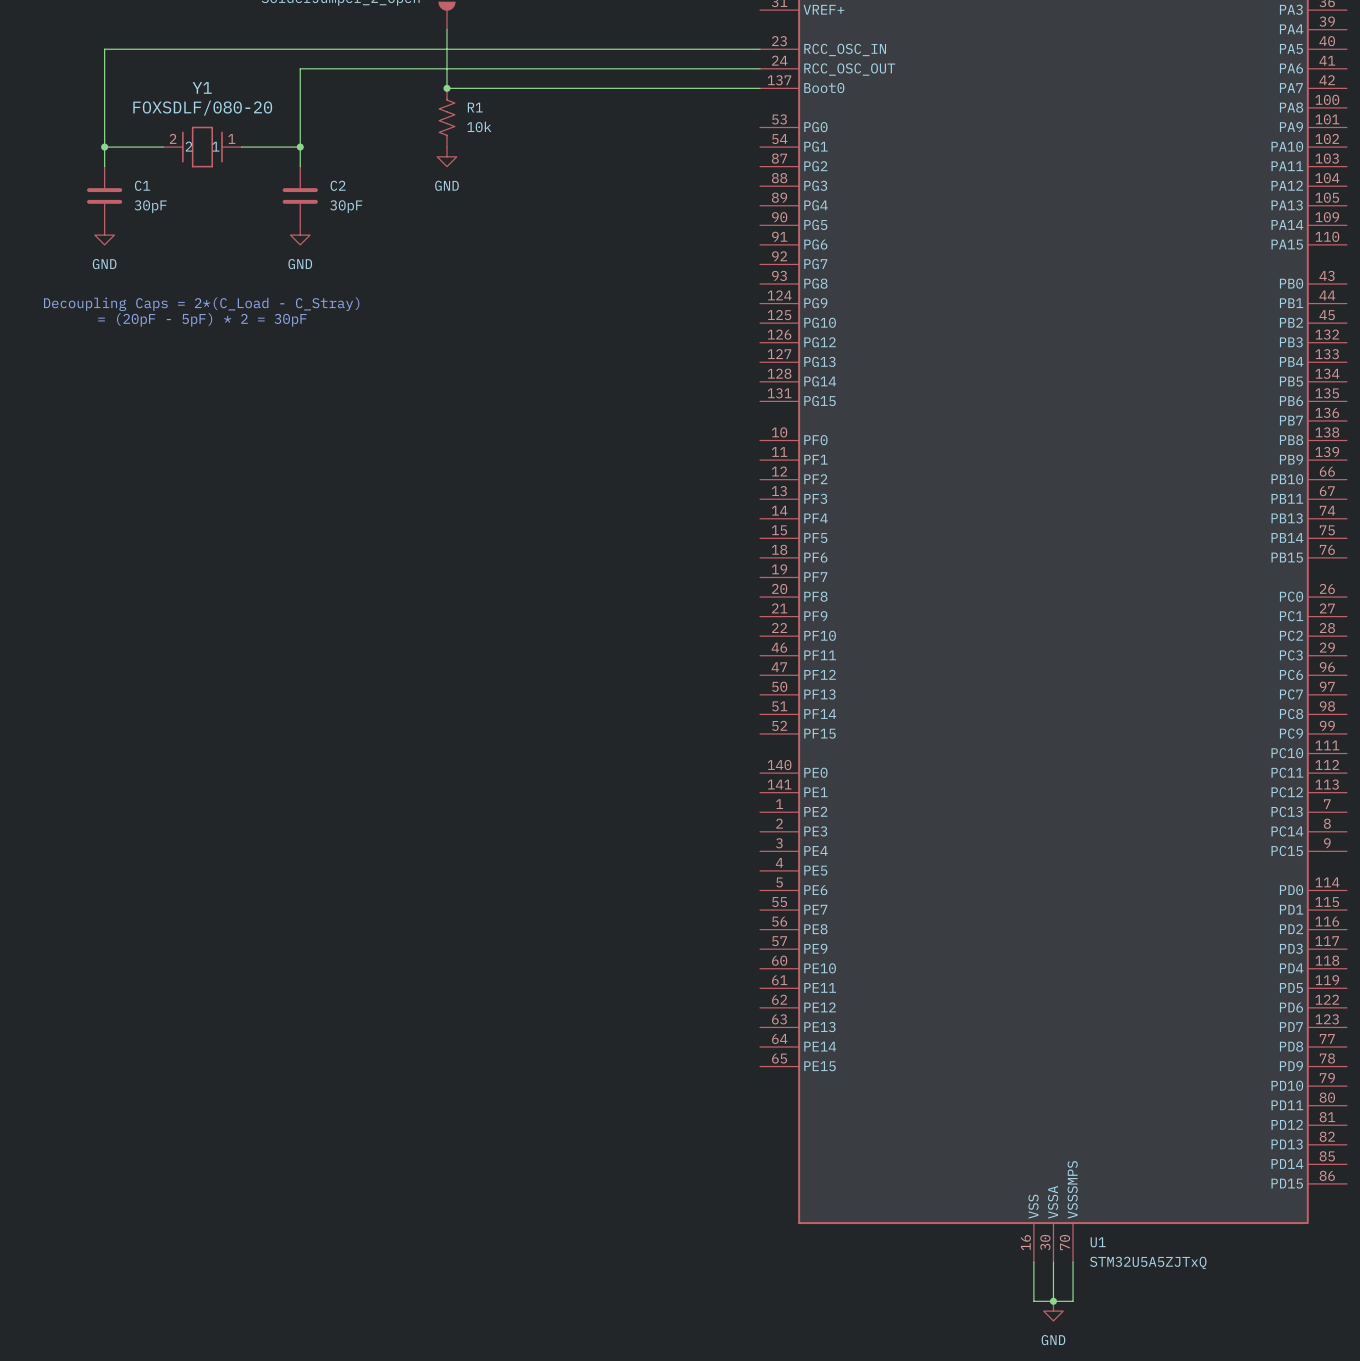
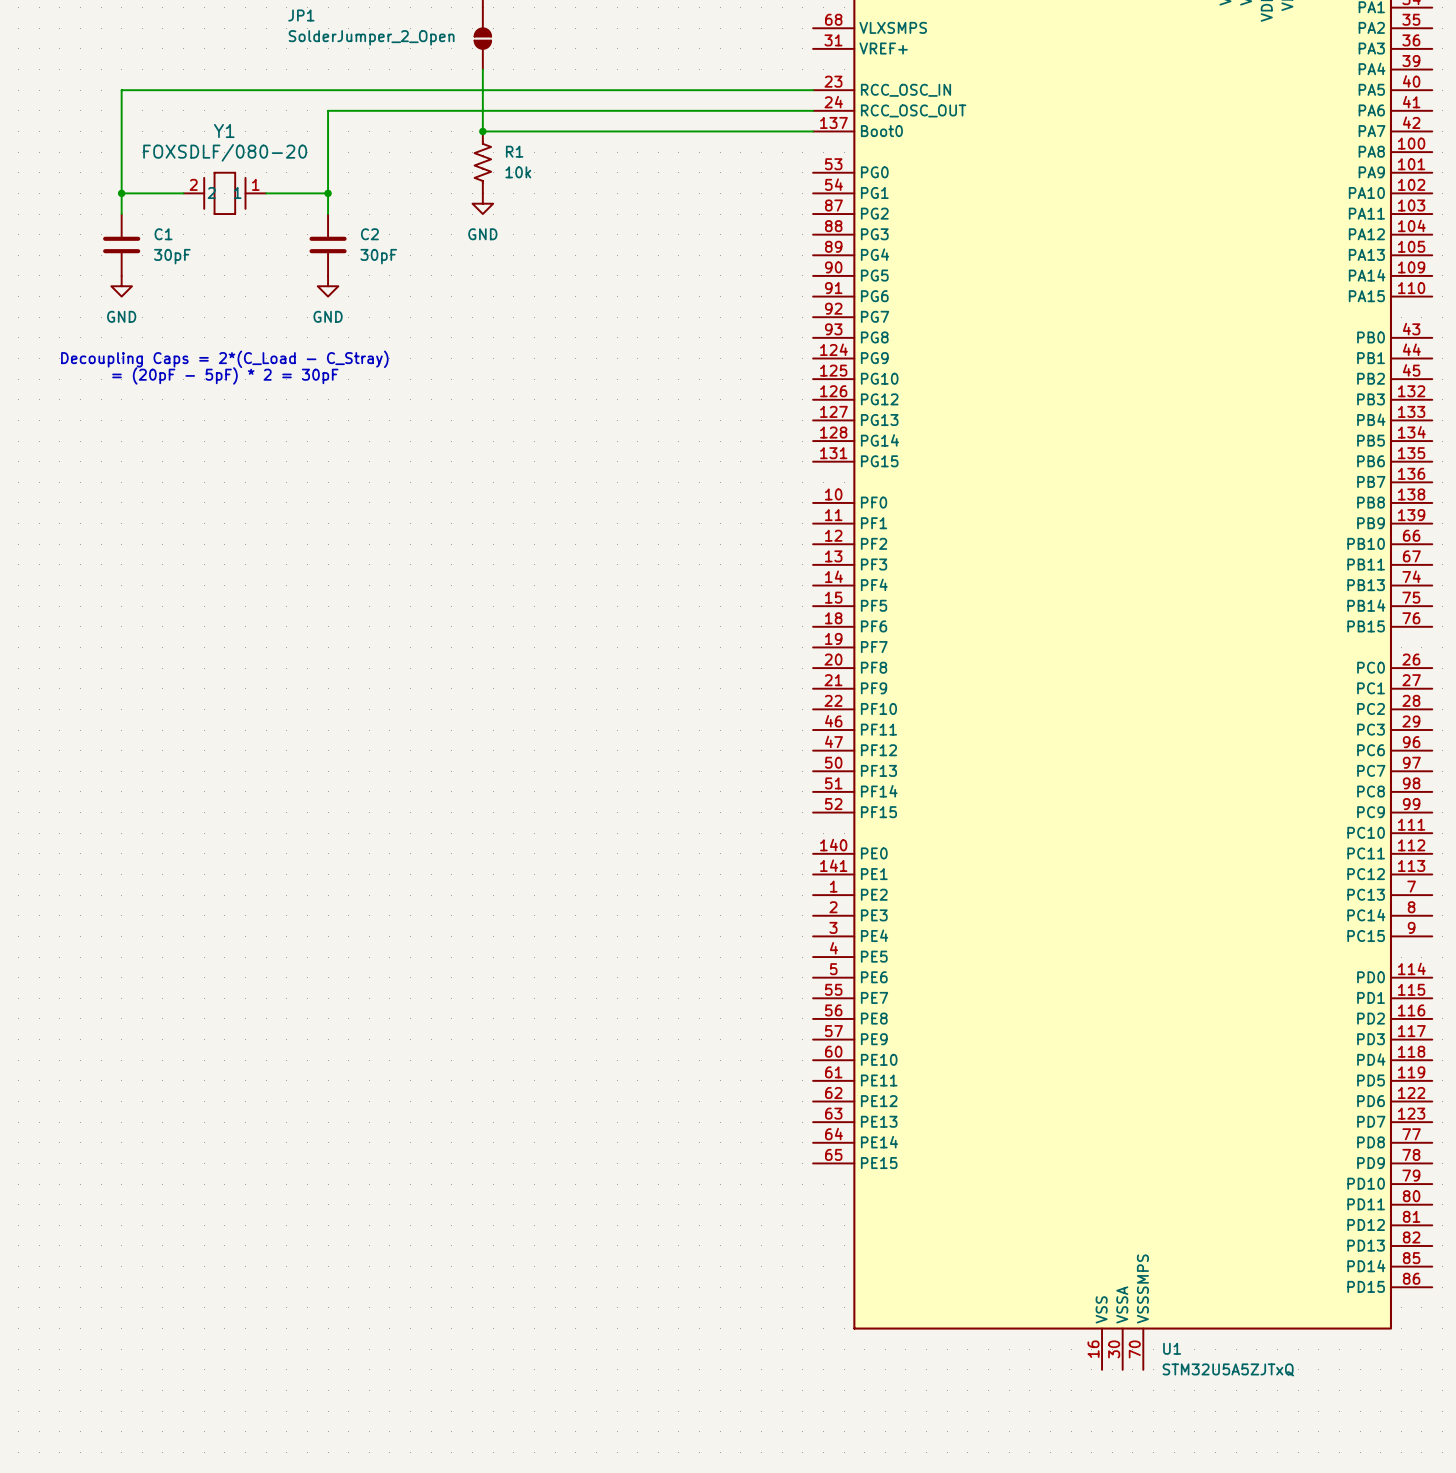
wire: (1033, 1262) (1033, 1301) (1073, 1301) (1073, 1262) -> none
wire: (1053, 1262) (1053, 1301) -> none
junction: (1053, 1301) -> none
power symbol: GND (1053, 1311) -> none

